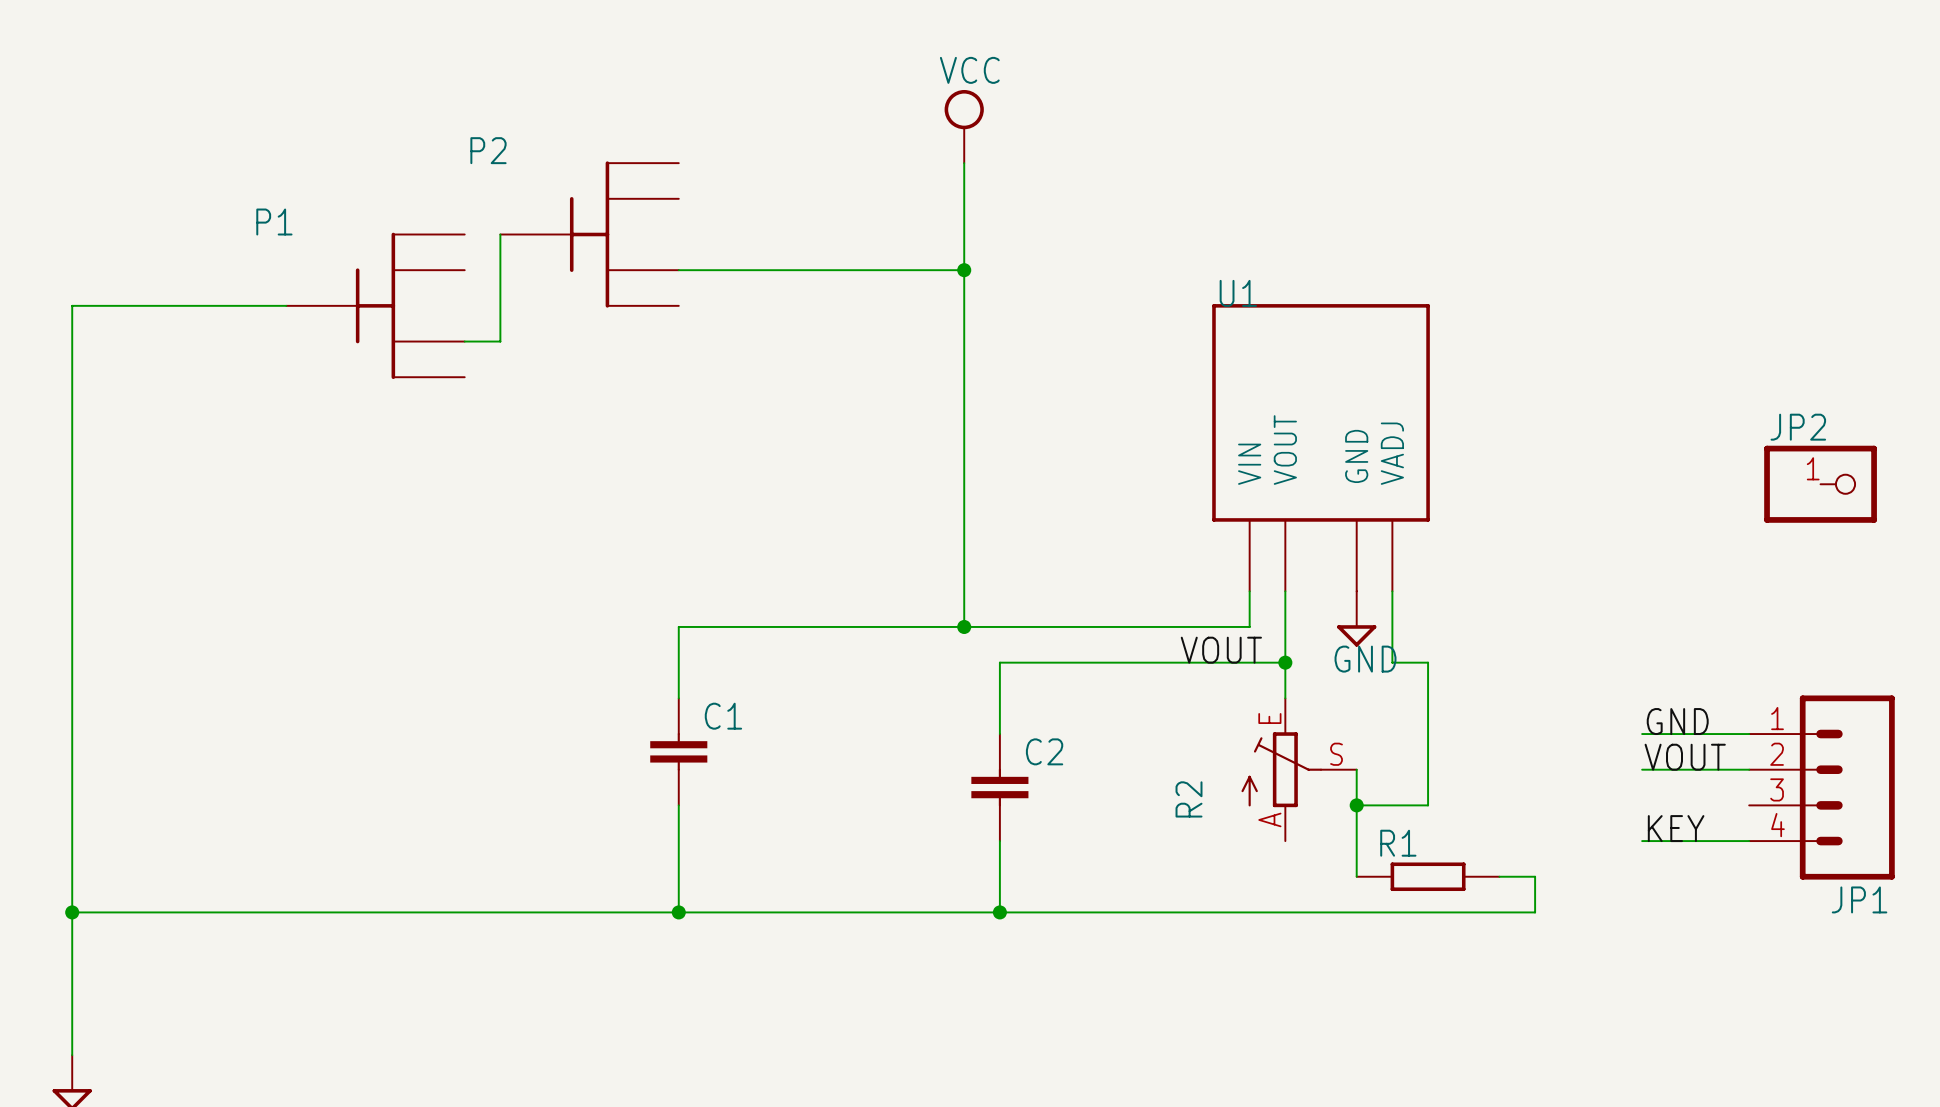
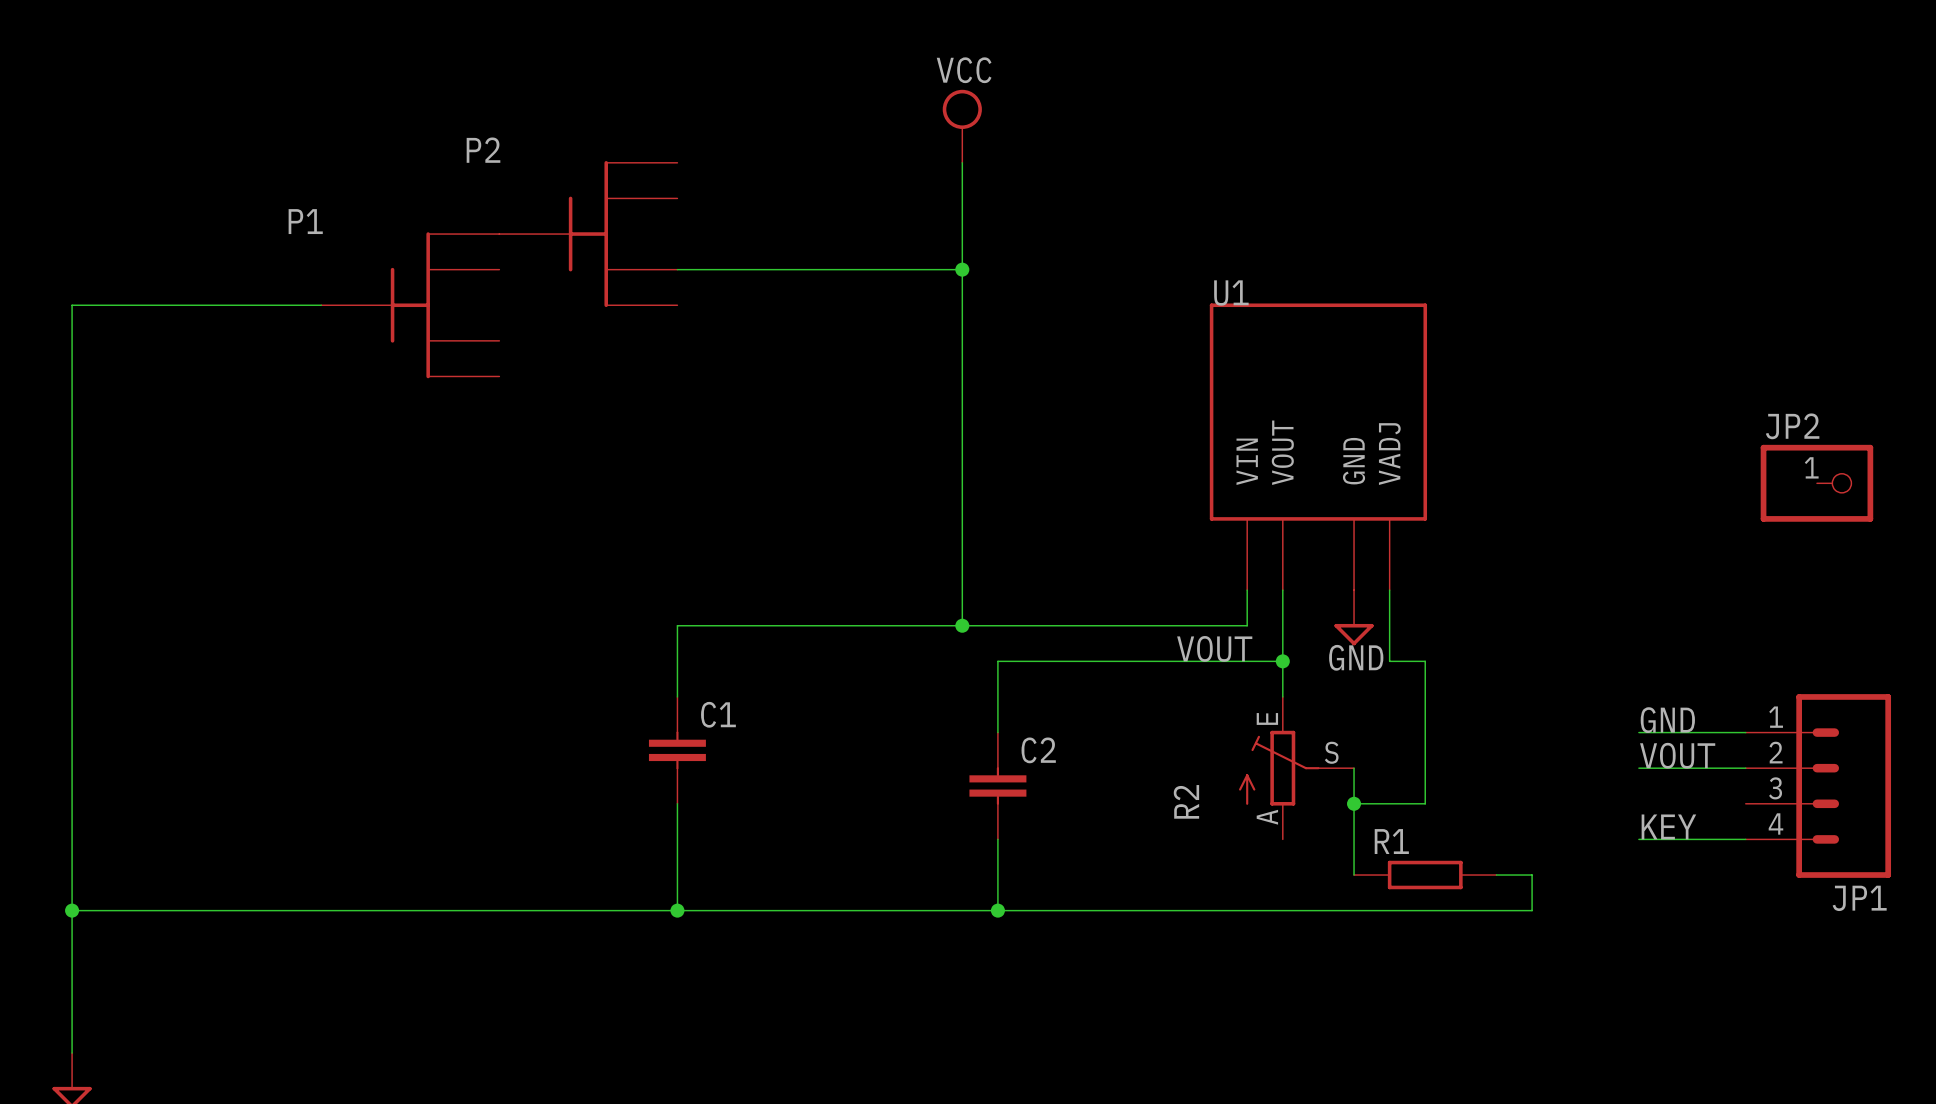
wire: (500, 234) (500, 341) (464, 341) -> none
P1 position: (375, 305) -> (410, 305)

